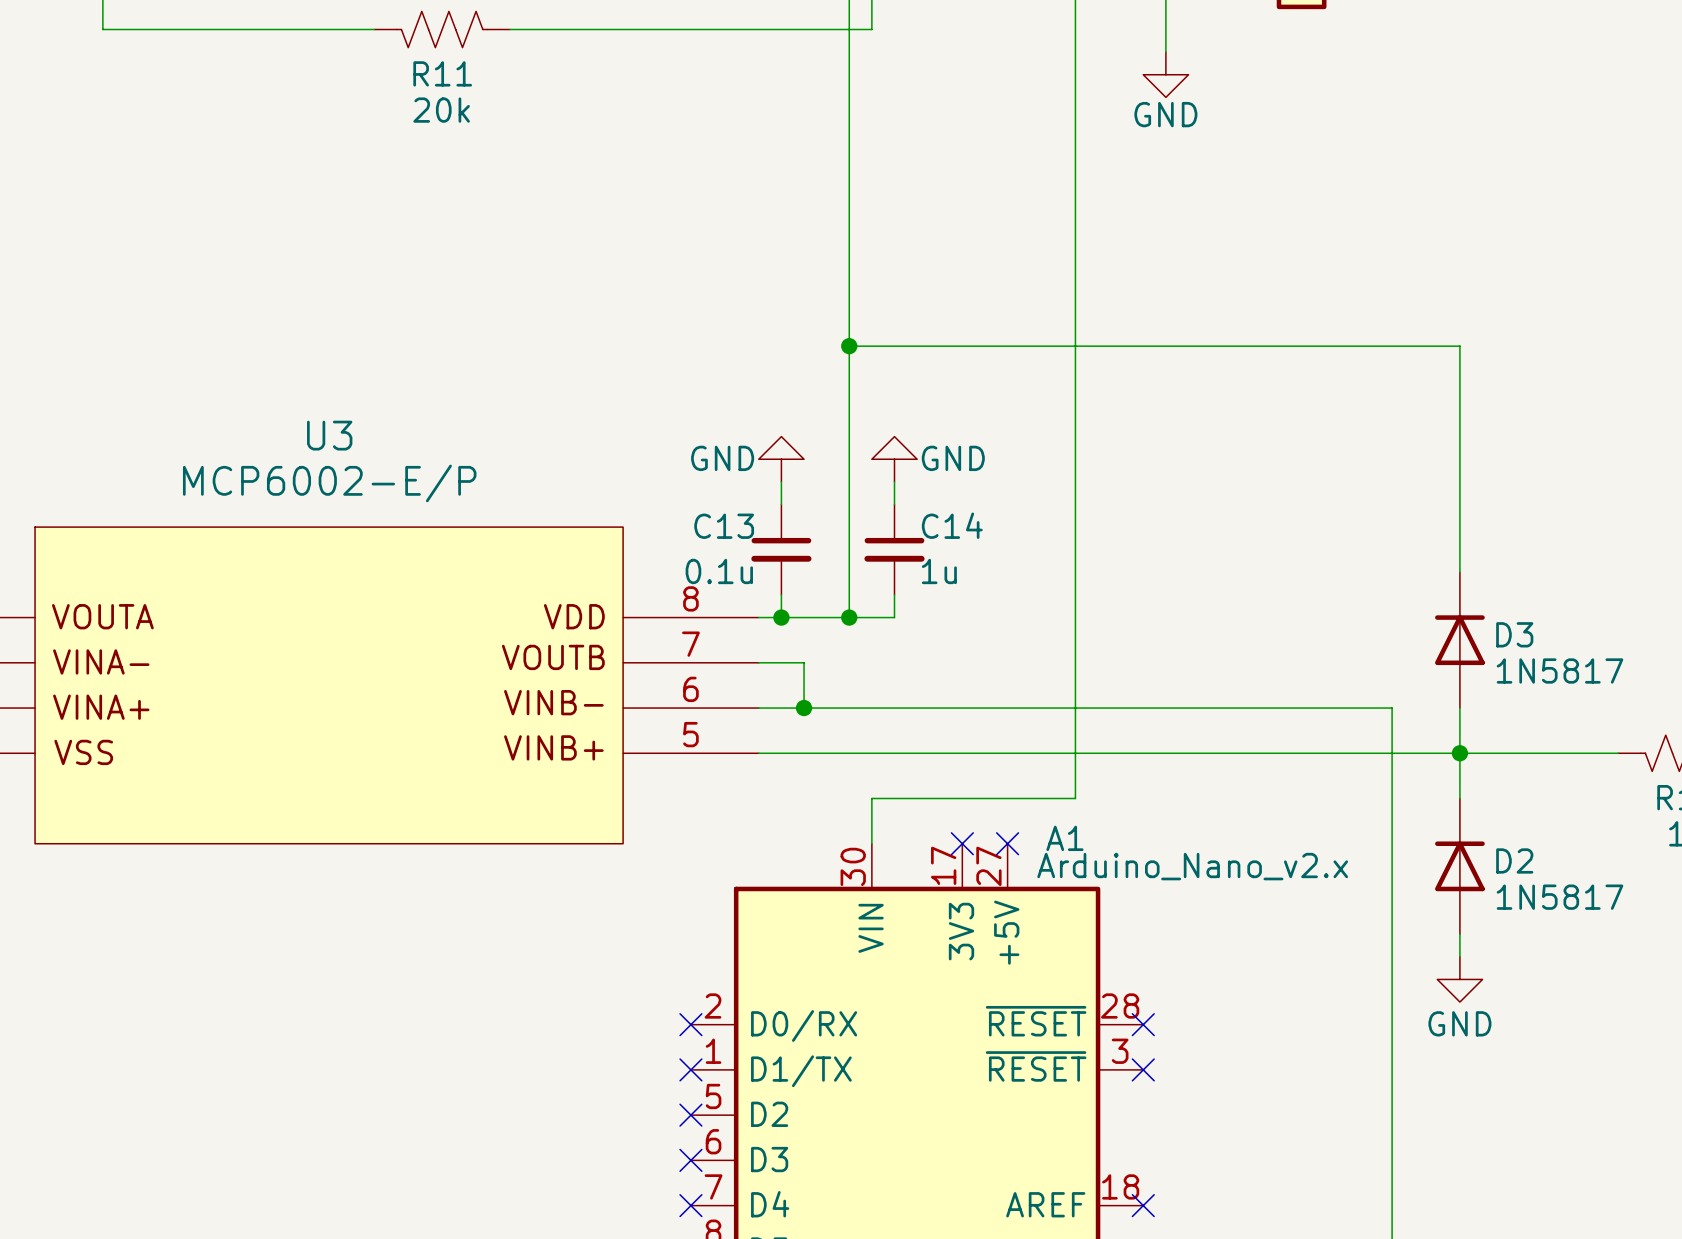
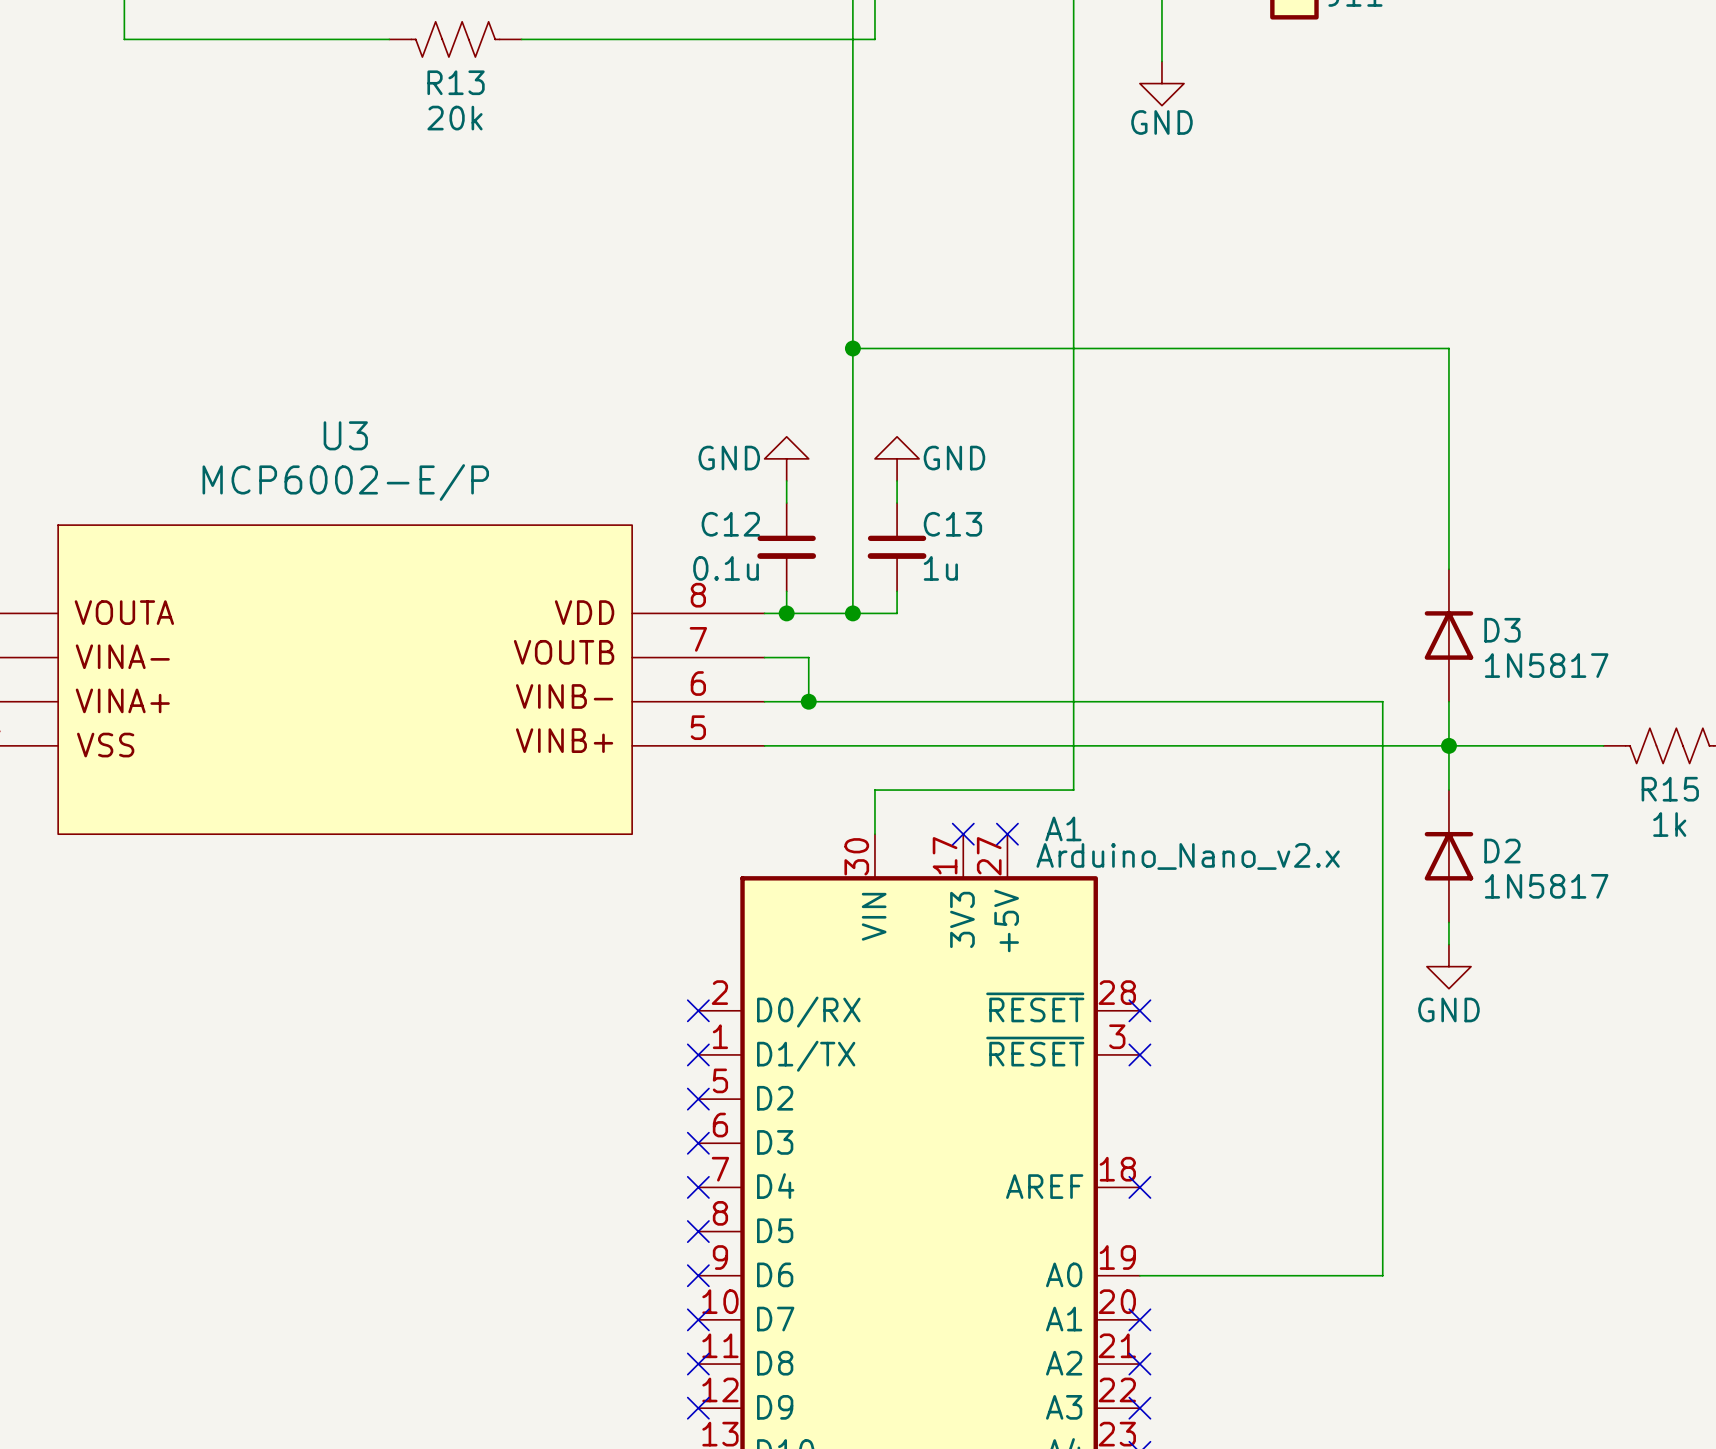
R11 name: R11 (442, 73) -> R13 (456, 82)
C14 name: C14 (952, 525) -> C13 (952, 524)
C13 name: C13 (724, 526) -> C12 (730, 524)

